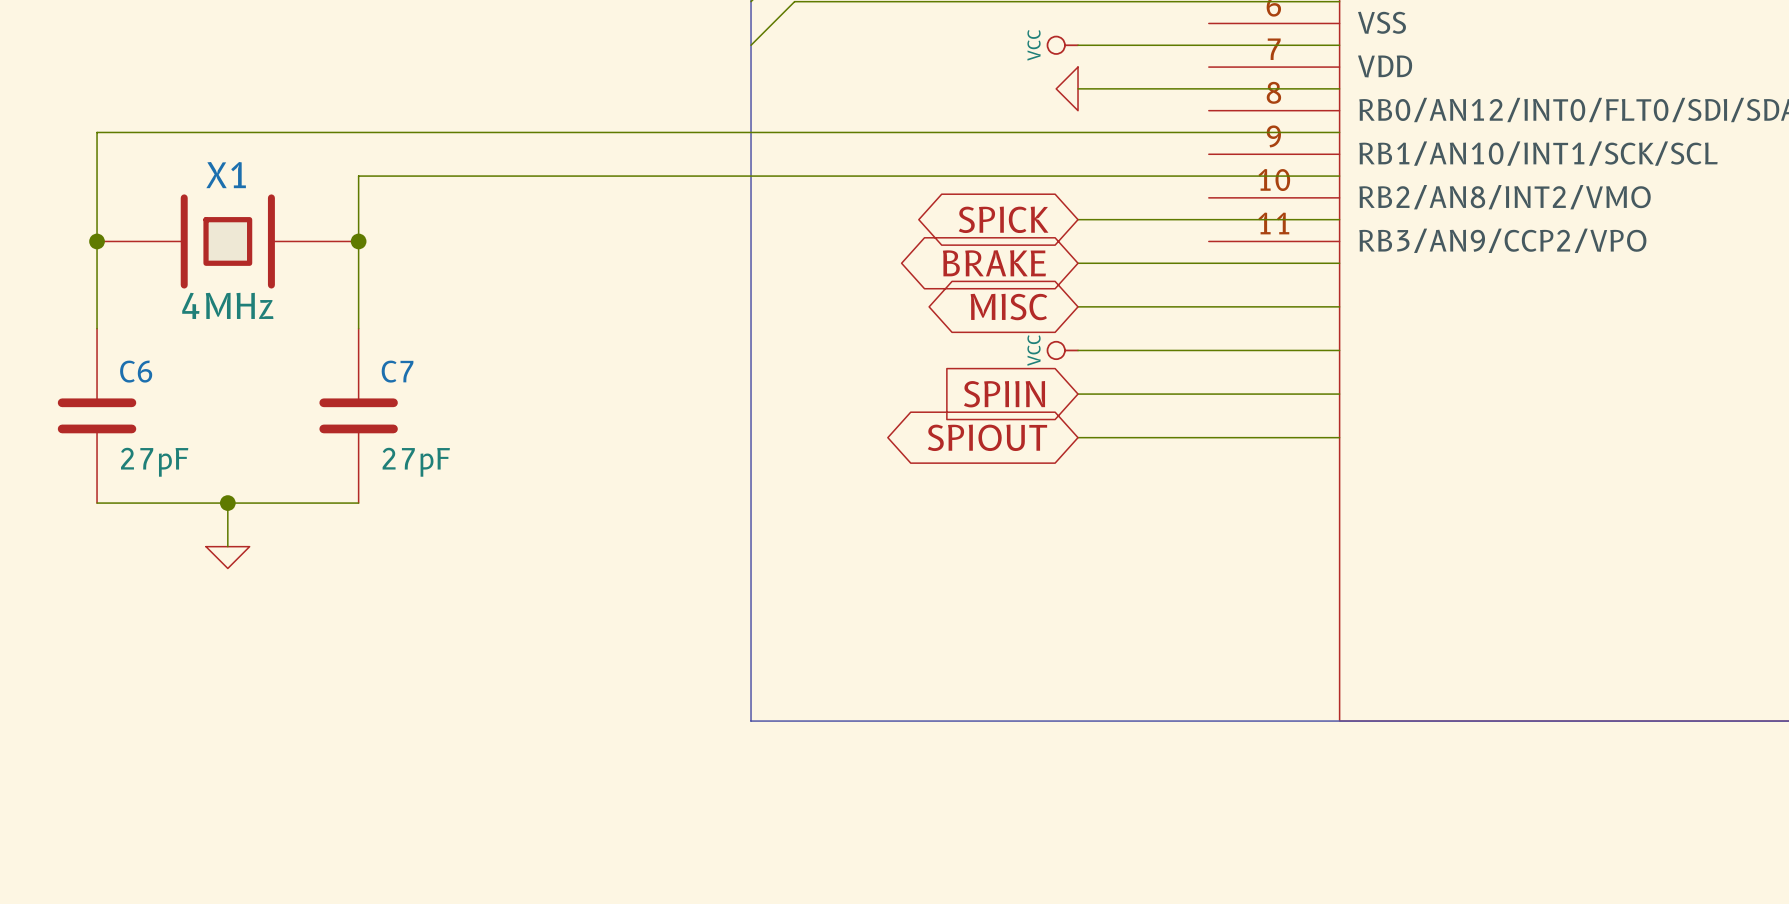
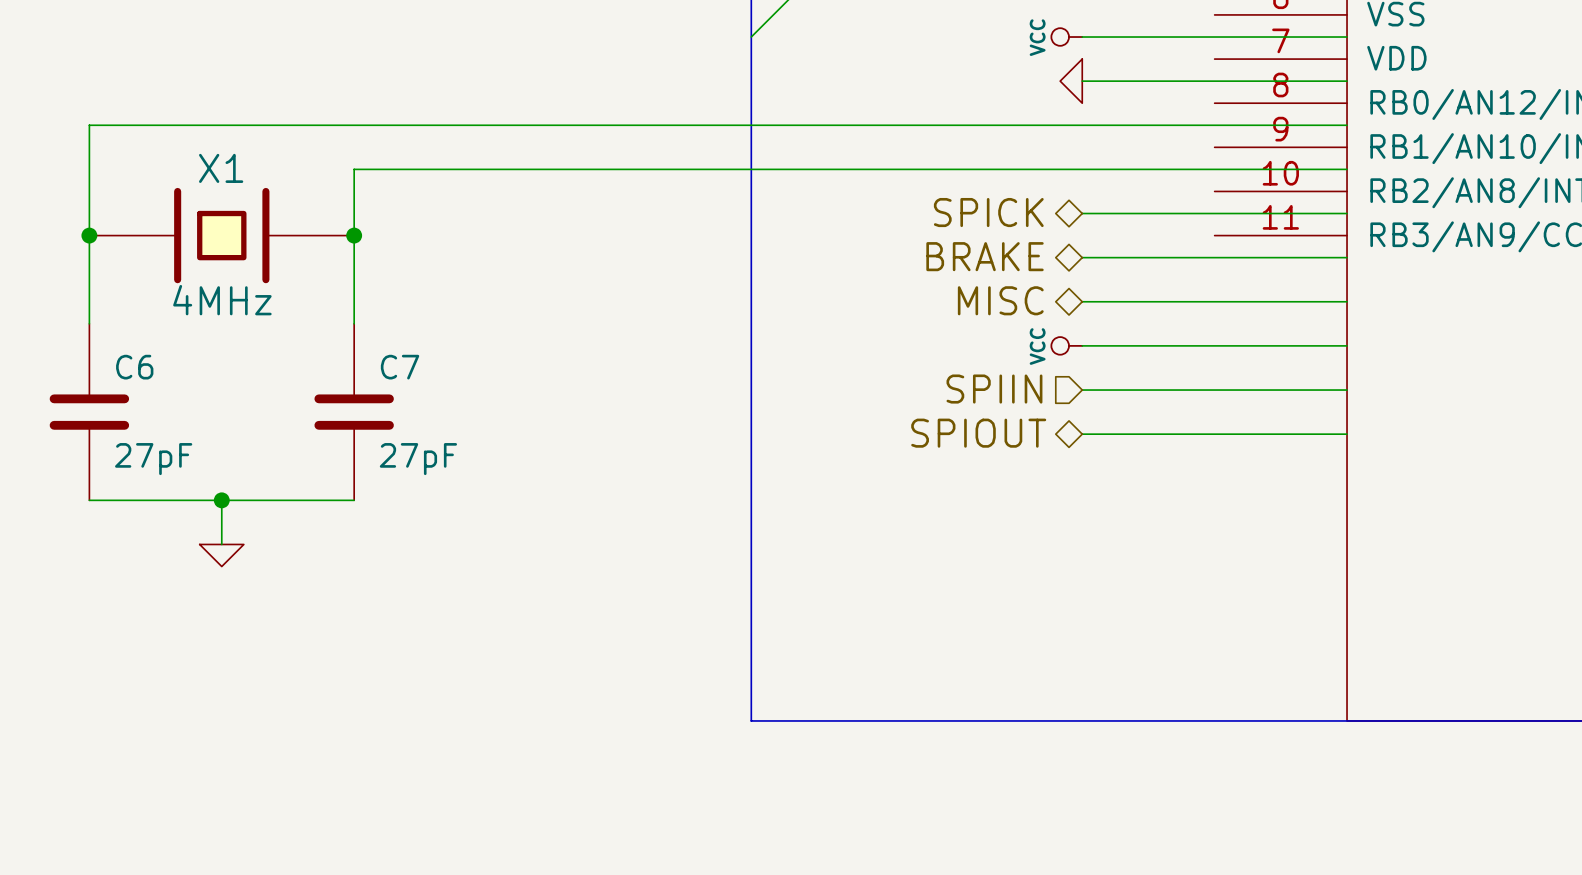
hierarchical label: none -> SPICK (988, 212)
global label: SPICK (1003, 219) -> none
hierarchical label: none -> BRAKE (985, 256)
global label: BRAKE (994, 263) -> none
hierarchical label: none -> MISC (1000, 300)
global label: MISC (1008, 307) -> none
hierarchical label: none -> SPIIN (994, 389)
global label: SPIIN (1004, 394) -> none
hierarchical label: none -> SPIOUT (978, 433)
global label: SPIOUT (987, 437) -> none

